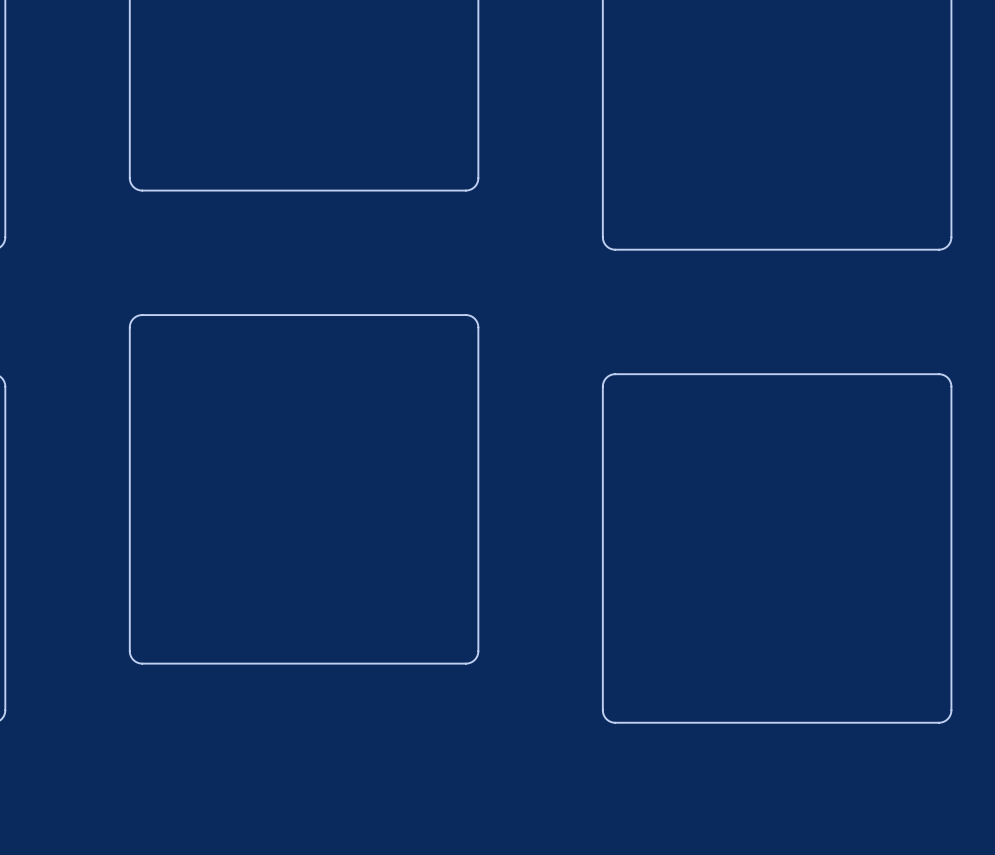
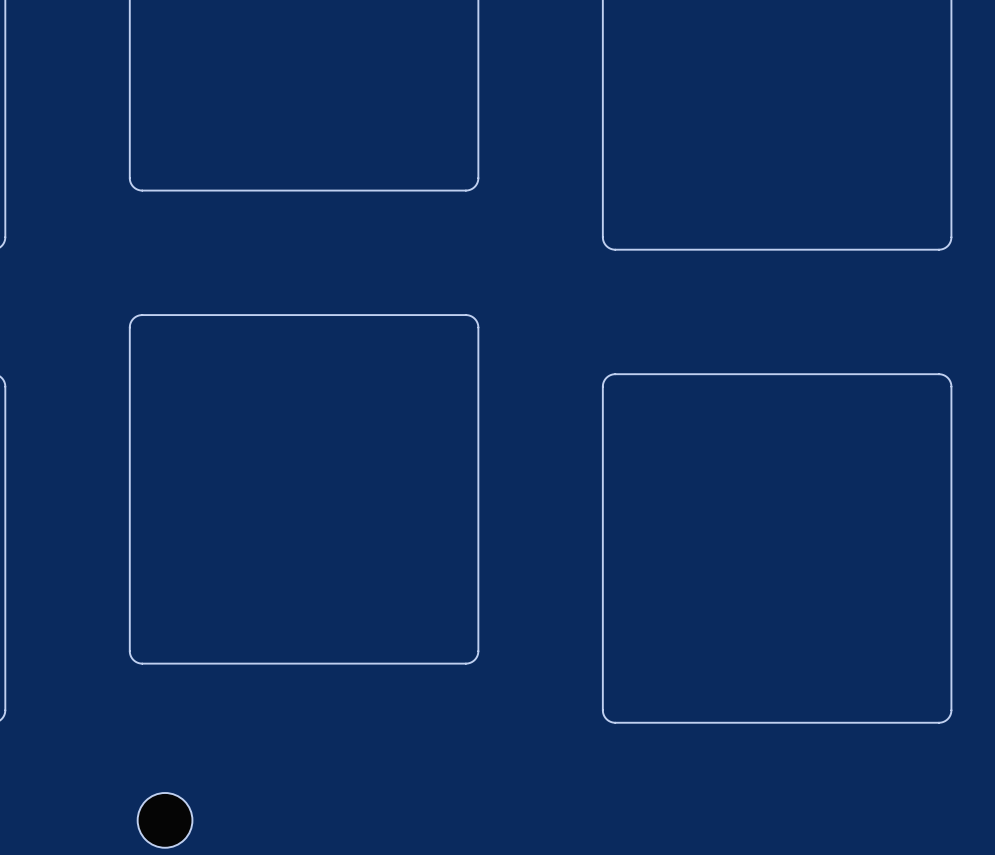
part: none -> (165, 820)

